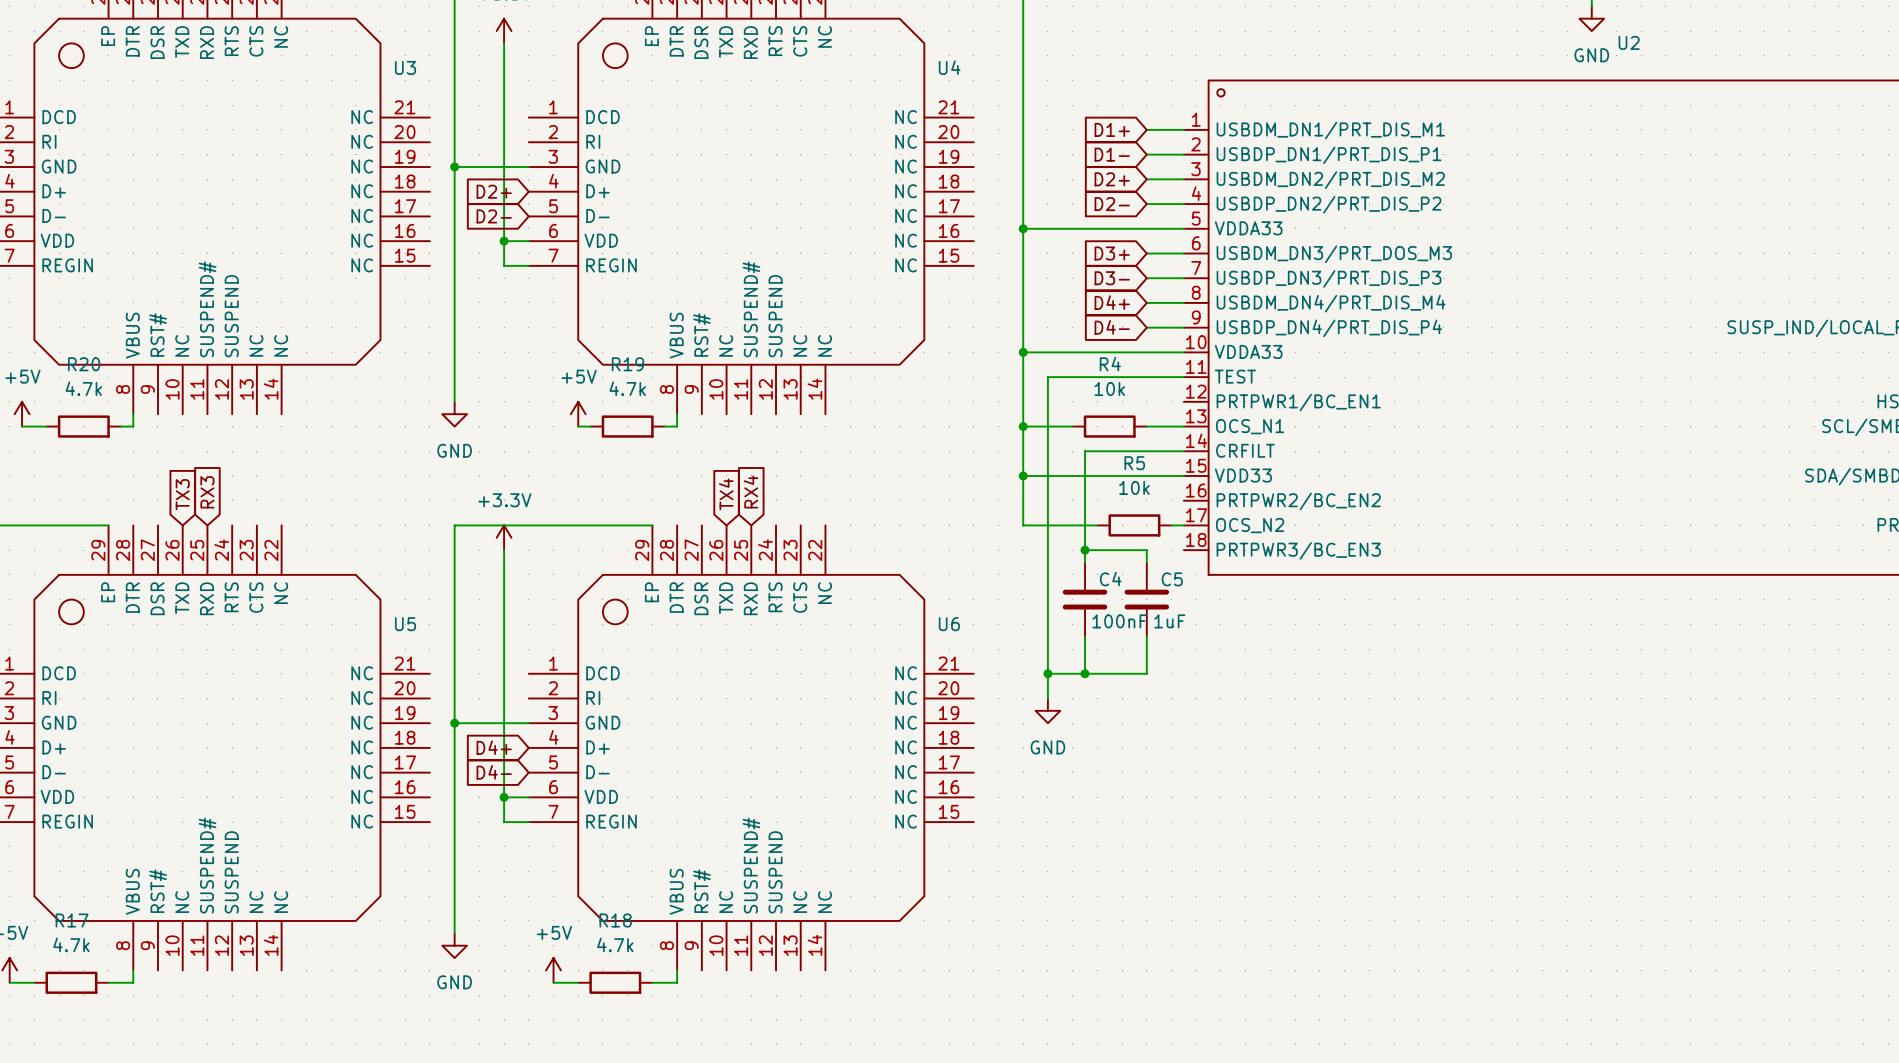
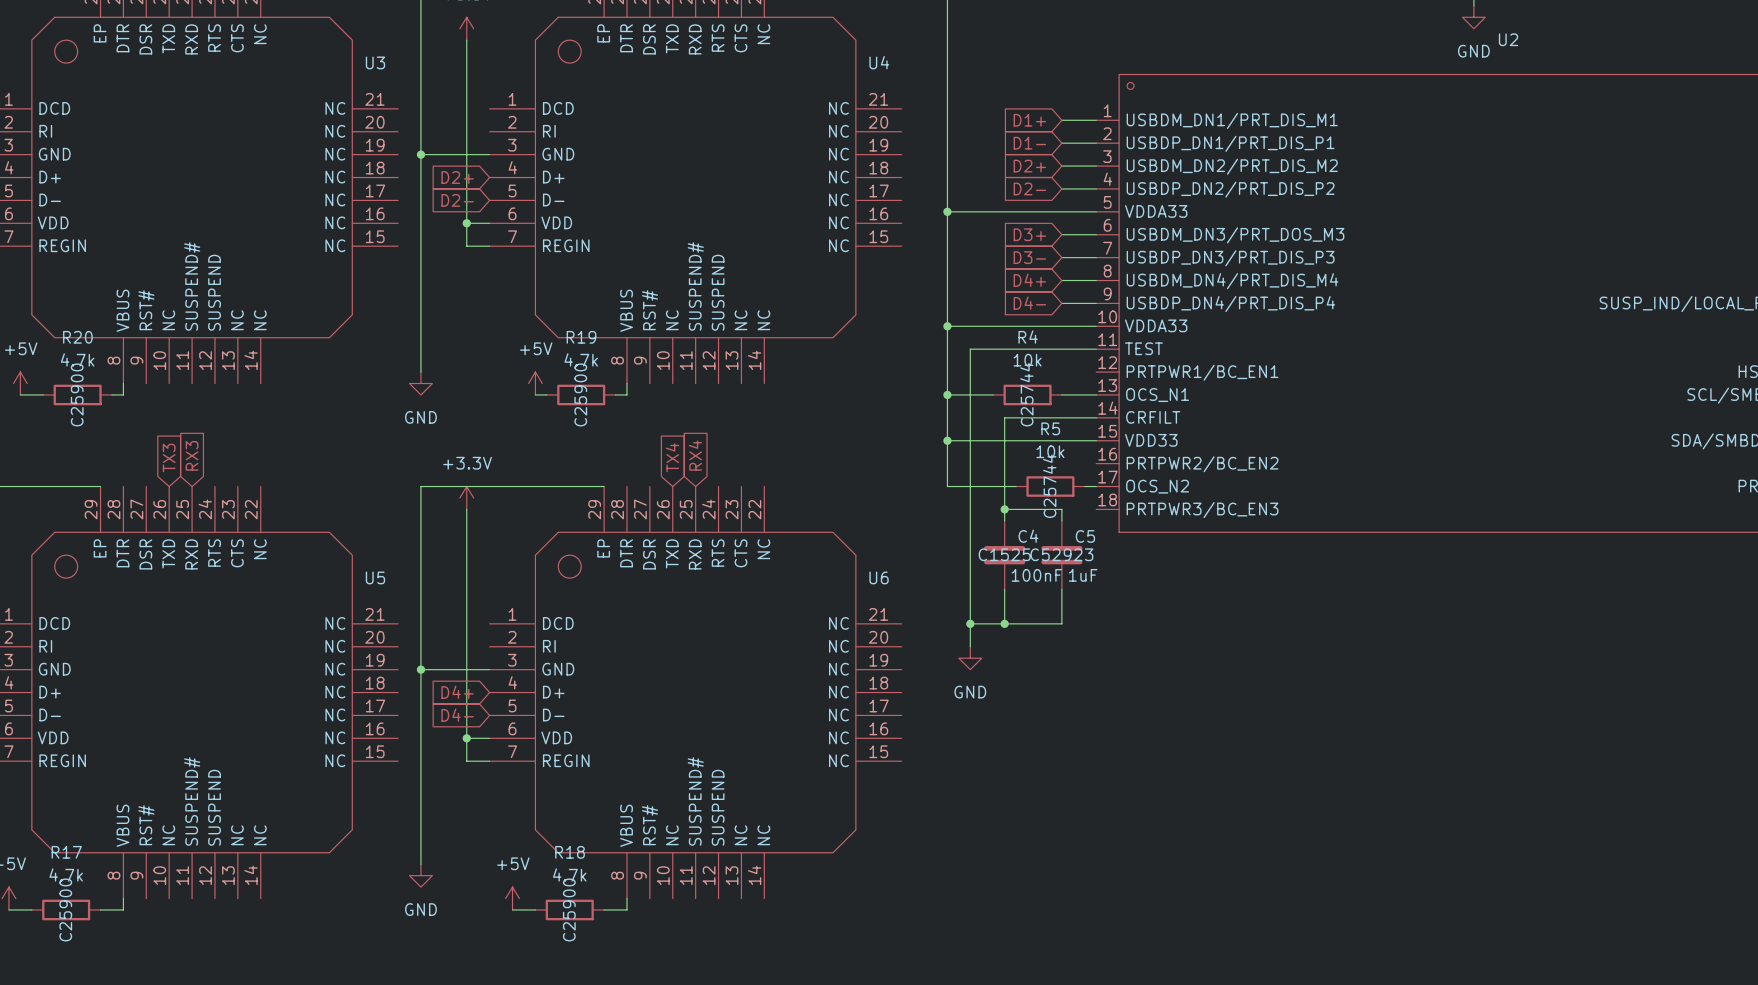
R20 text: none -> C25900 (77, 394)
R19 text: none -> C25900 (580, 394)
R4 text: none -> C25744 (1026, 394)
R5 text: none -> C25744 (1049, 486)
C4 text: none -> C1525 (1004, 554)
C5 text: none -> C52923 (1061, 554)
R17 text: none -> C25900 (65, 909)
R18 text: none -> C25900 (569, 909)

